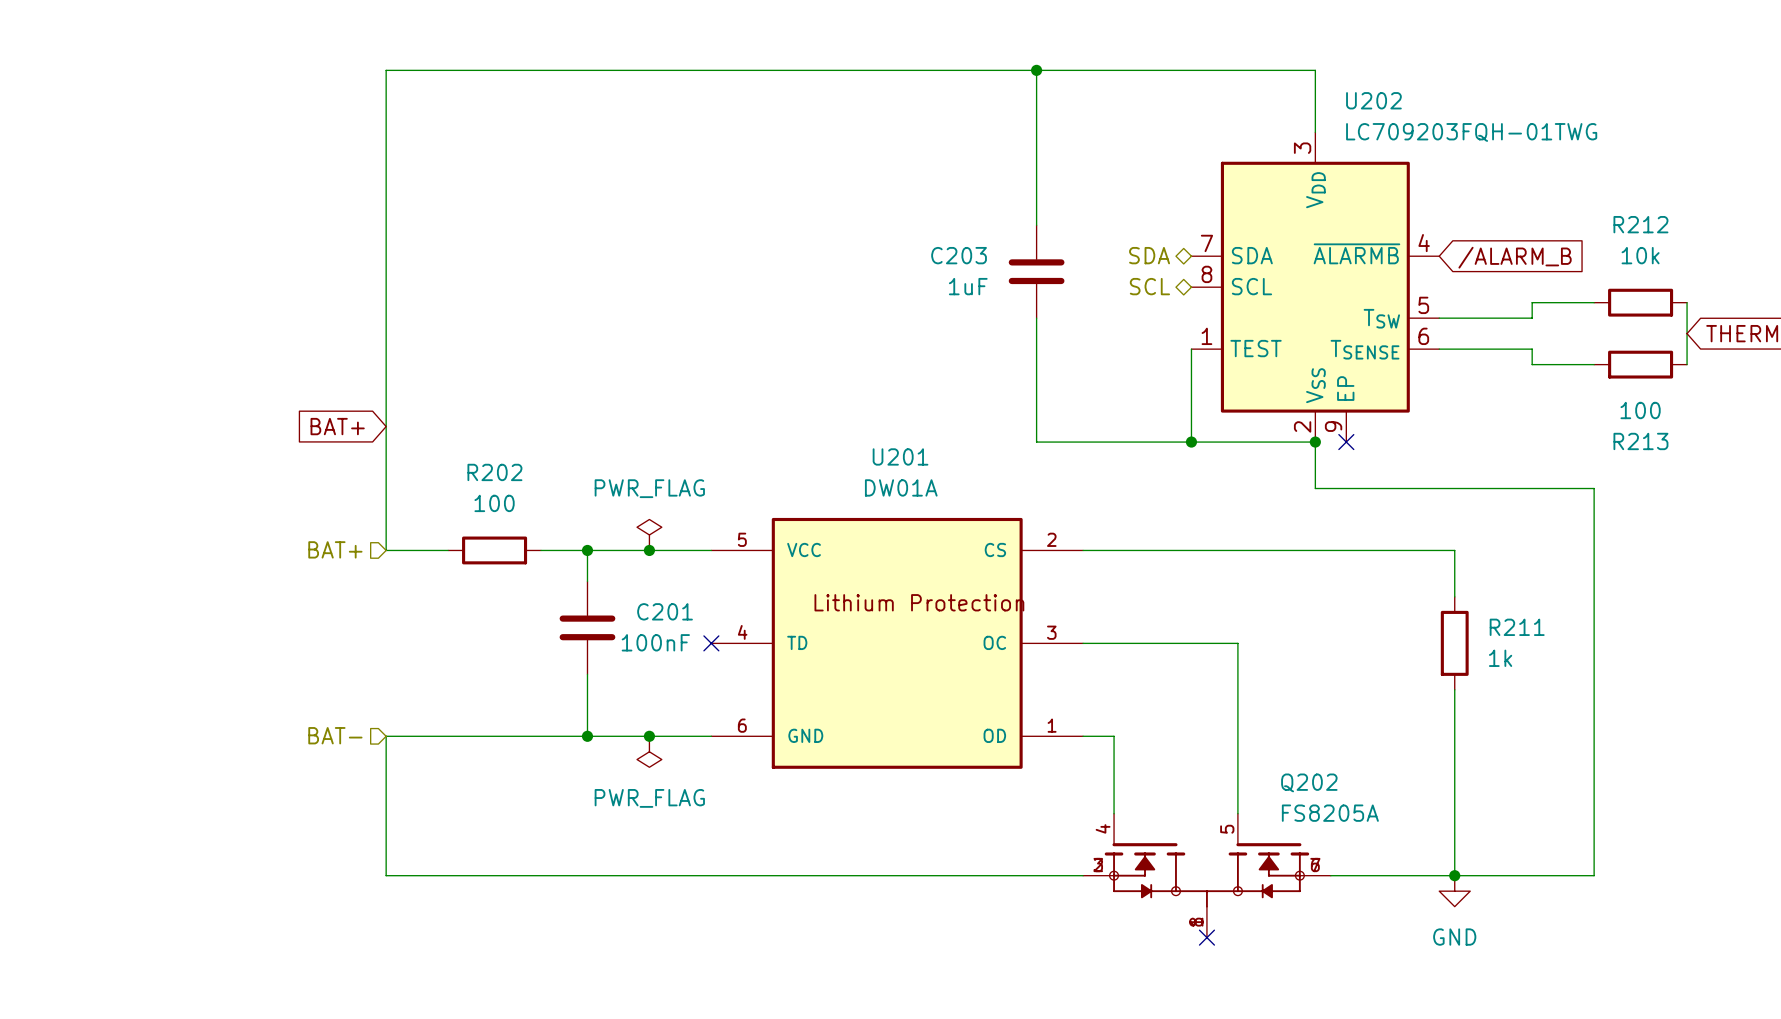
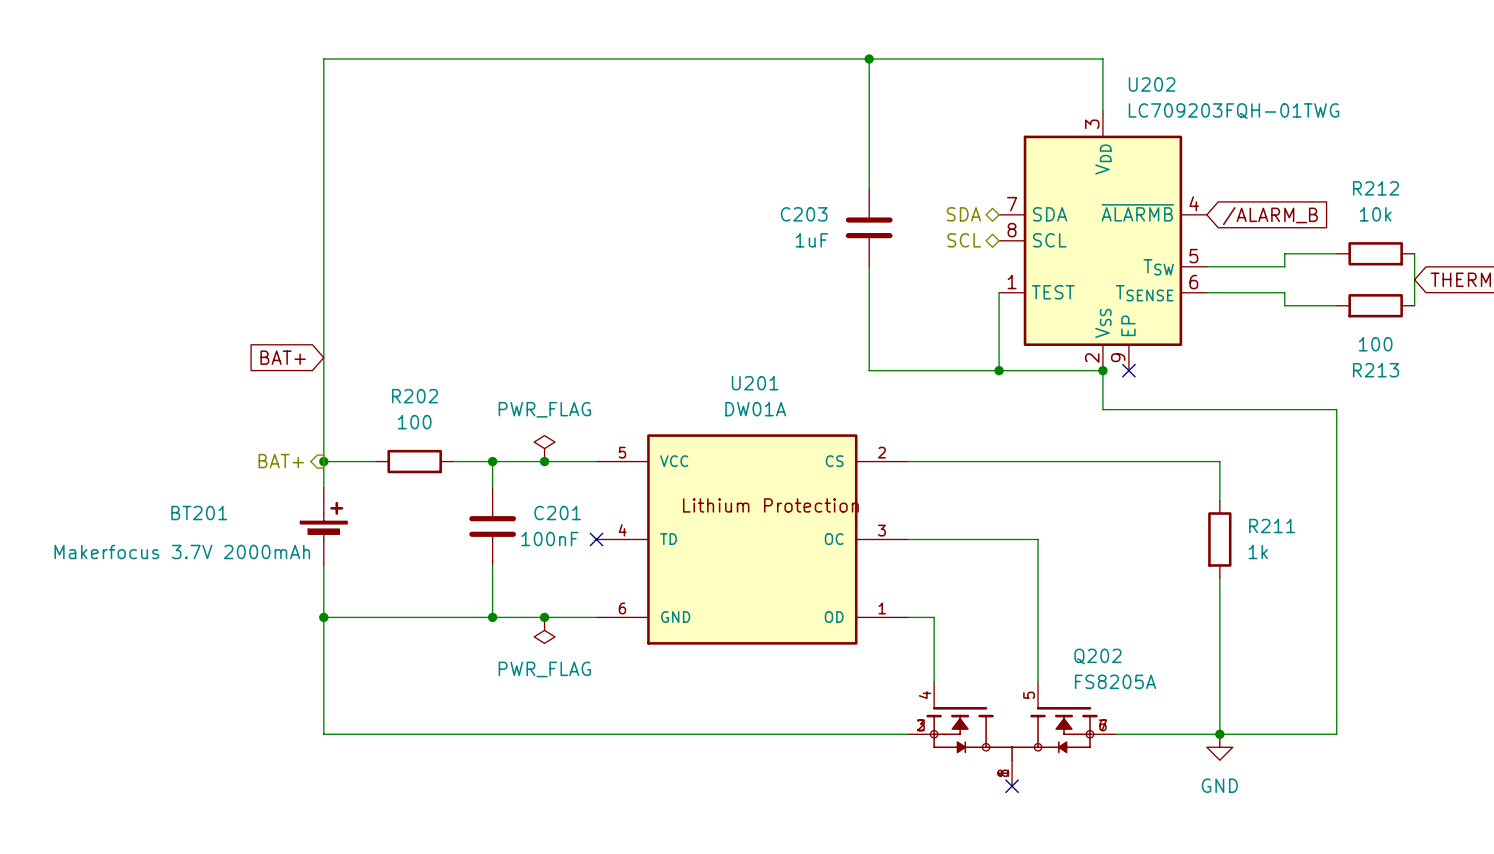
hierarchical label shape: input (335, 549) -> output (281, 461)
wire: none -> (323, 461) (323, 487)
junction: none -> (323, 461)
BT201: none -> Makerfocus 3.7V 2000mAh (323, 526)
wire: none -> (323, 565) (323, 617)
hierarchical label: BAT- (335, 735) -> none
junction: none -> (323, 617)

